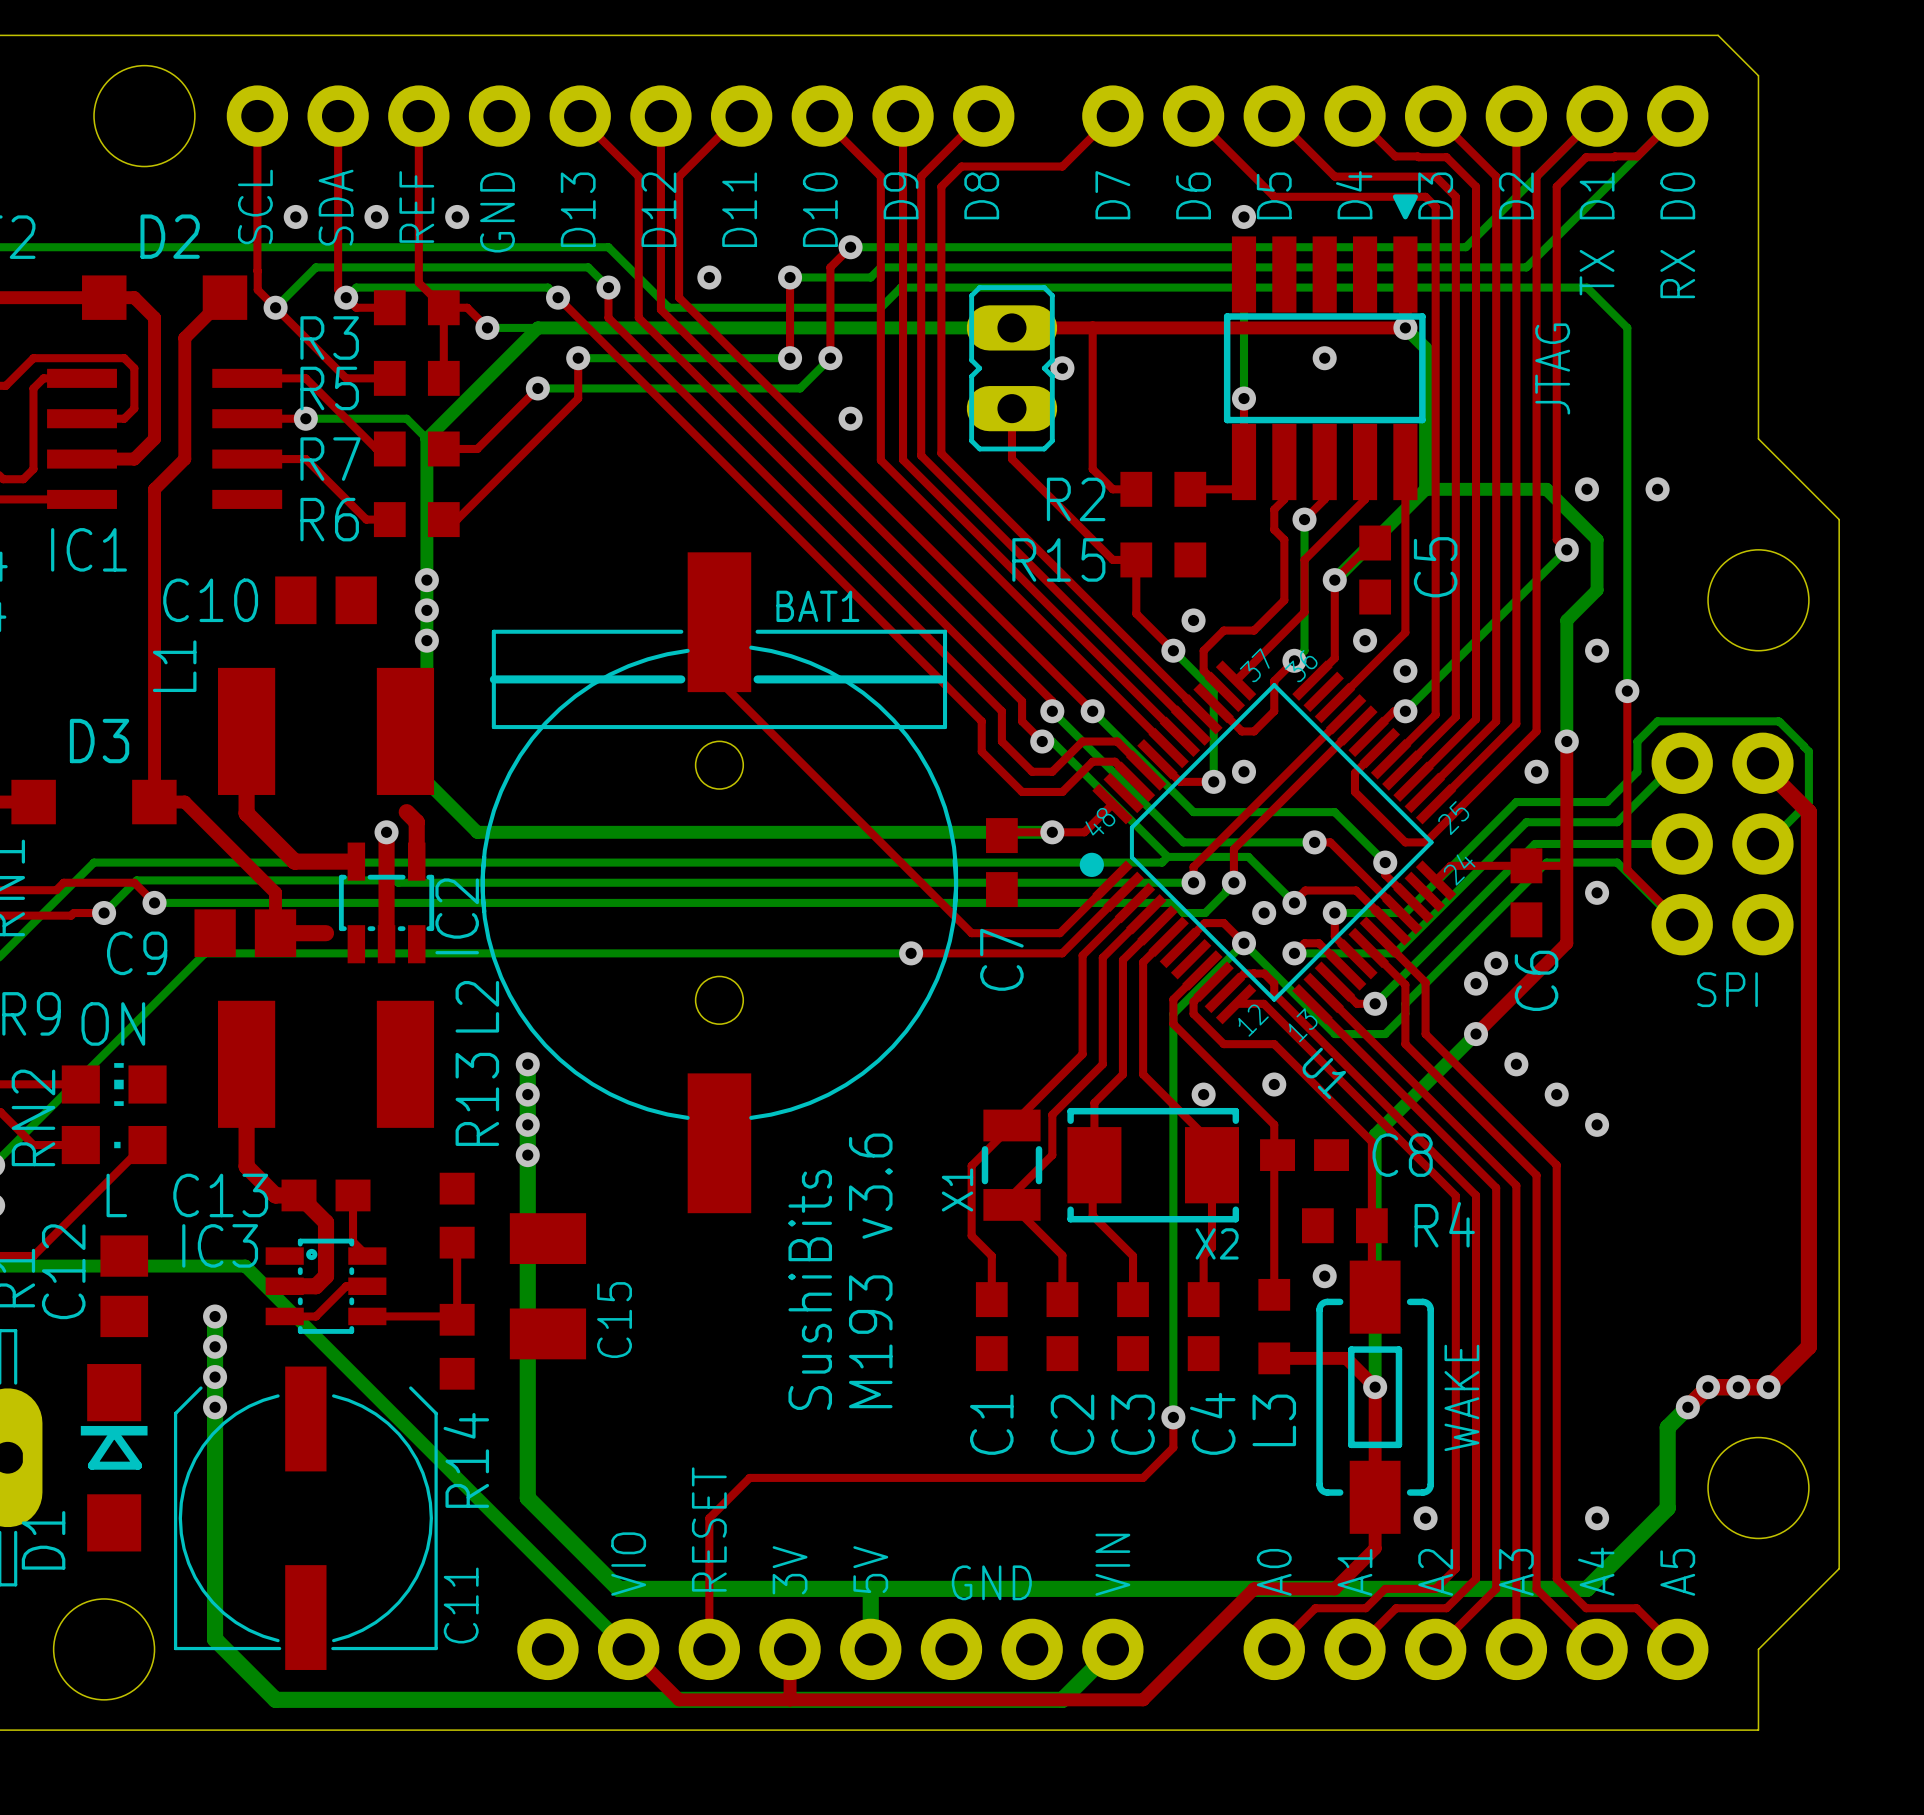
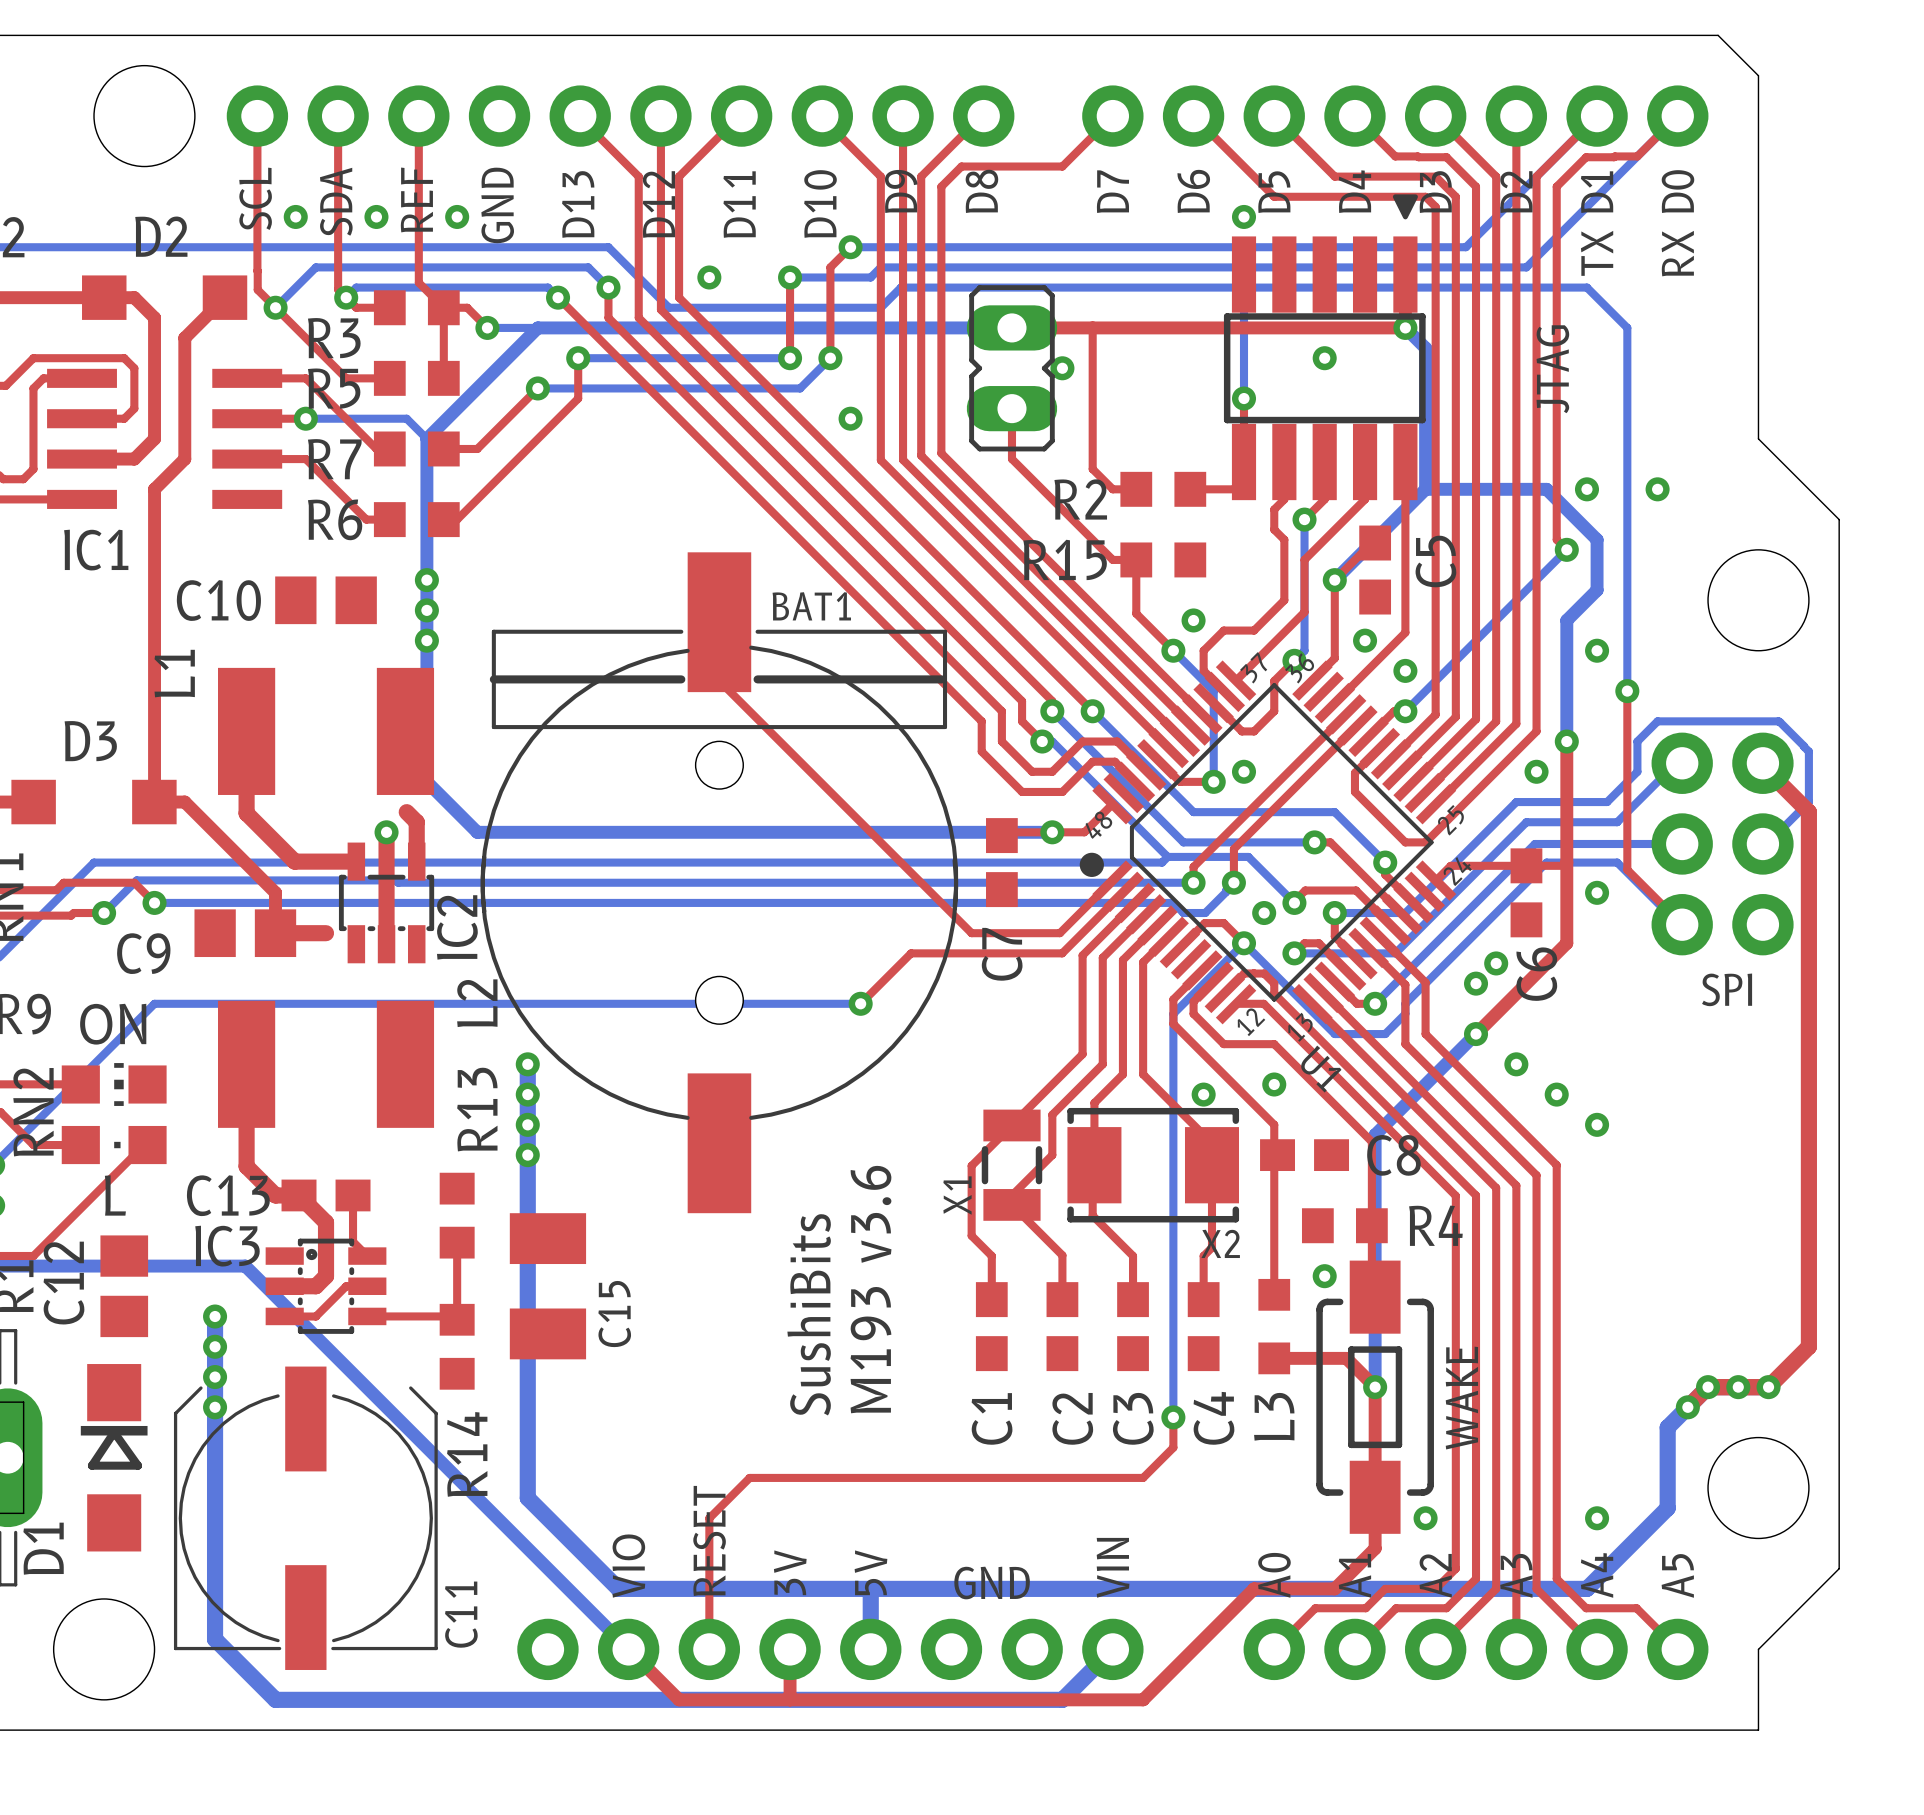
top track: none -> (911, 953) (860, 1003)
bottom track: (911, 953) (204, 953) (154, 1003) -> (860, 1003) (154, 1003)
via position: (911, 953) -> (860, 1003)

